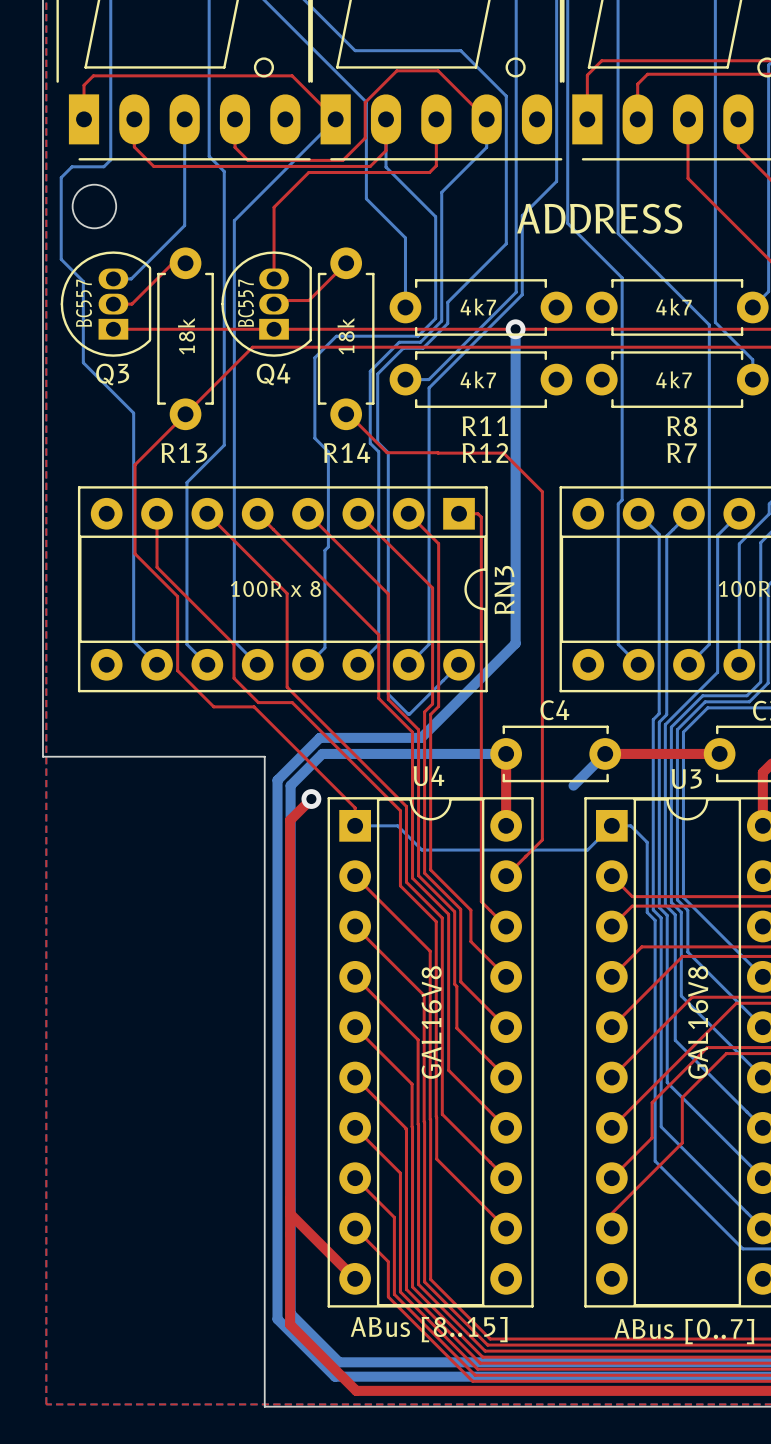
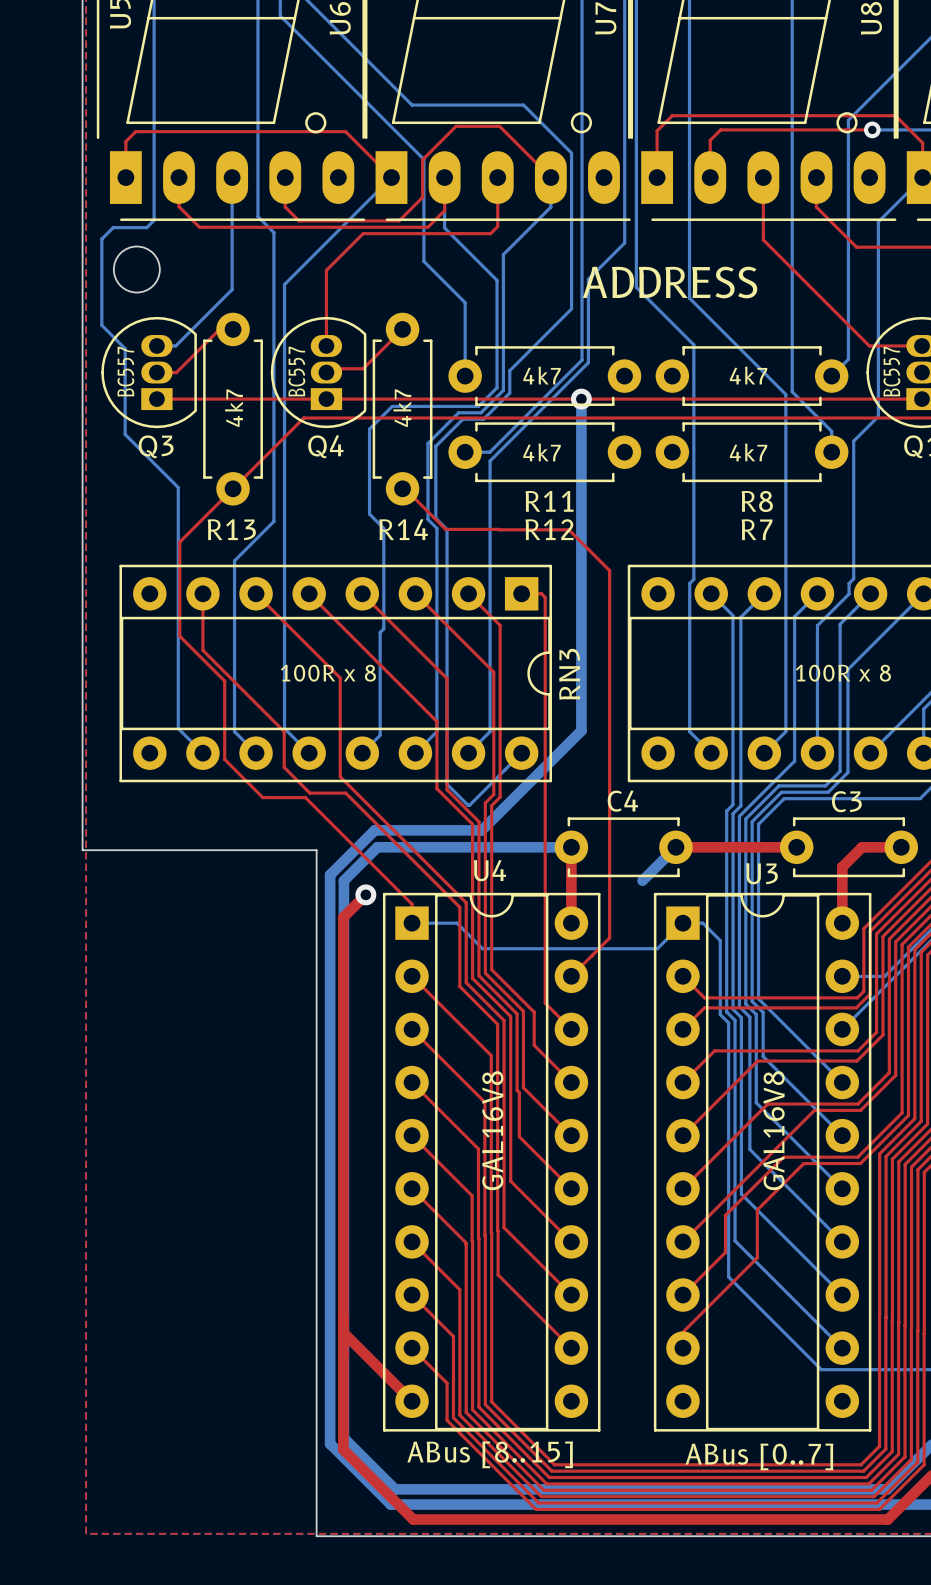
text: 18k (186, 336) -> 4k7 (233, 408)
text: 18k (346, 336) -> 4k7 (402, 408)

